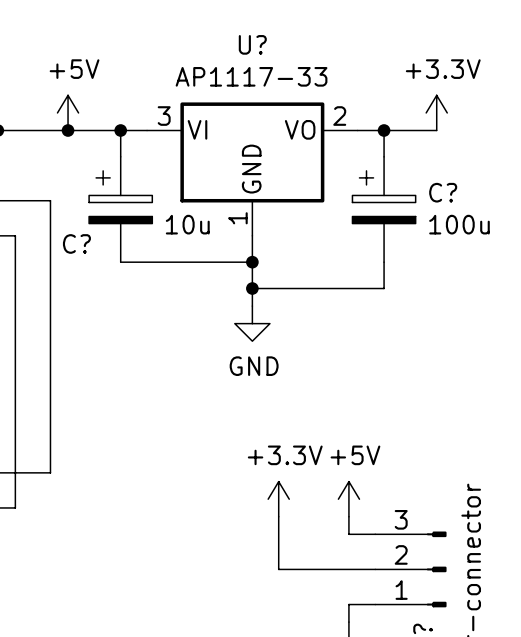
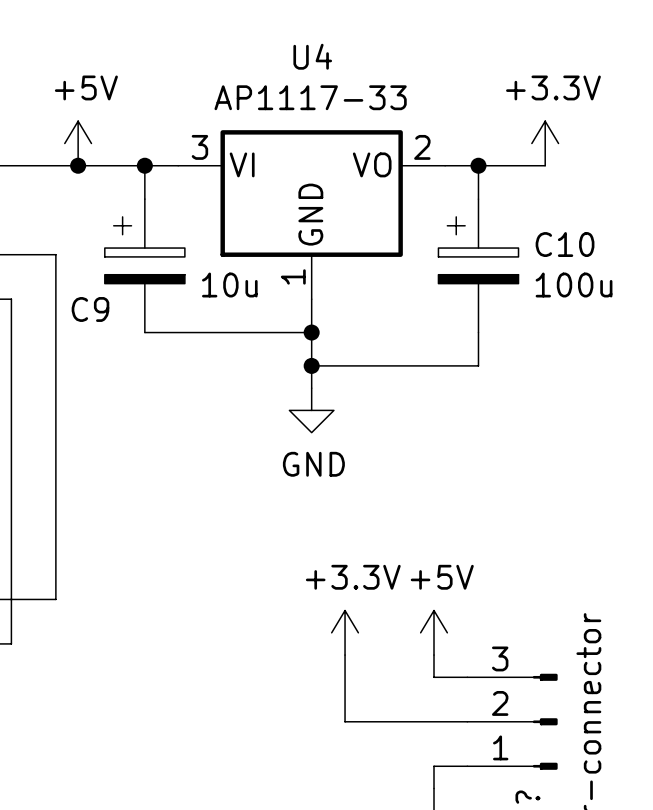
U? name: U? (252, 44) -> U4 (312, 56)
C? name: C? (443, 192) -> C10 (565, 244)
C? name: C? (76, 243) -> C9 (90, 309)

